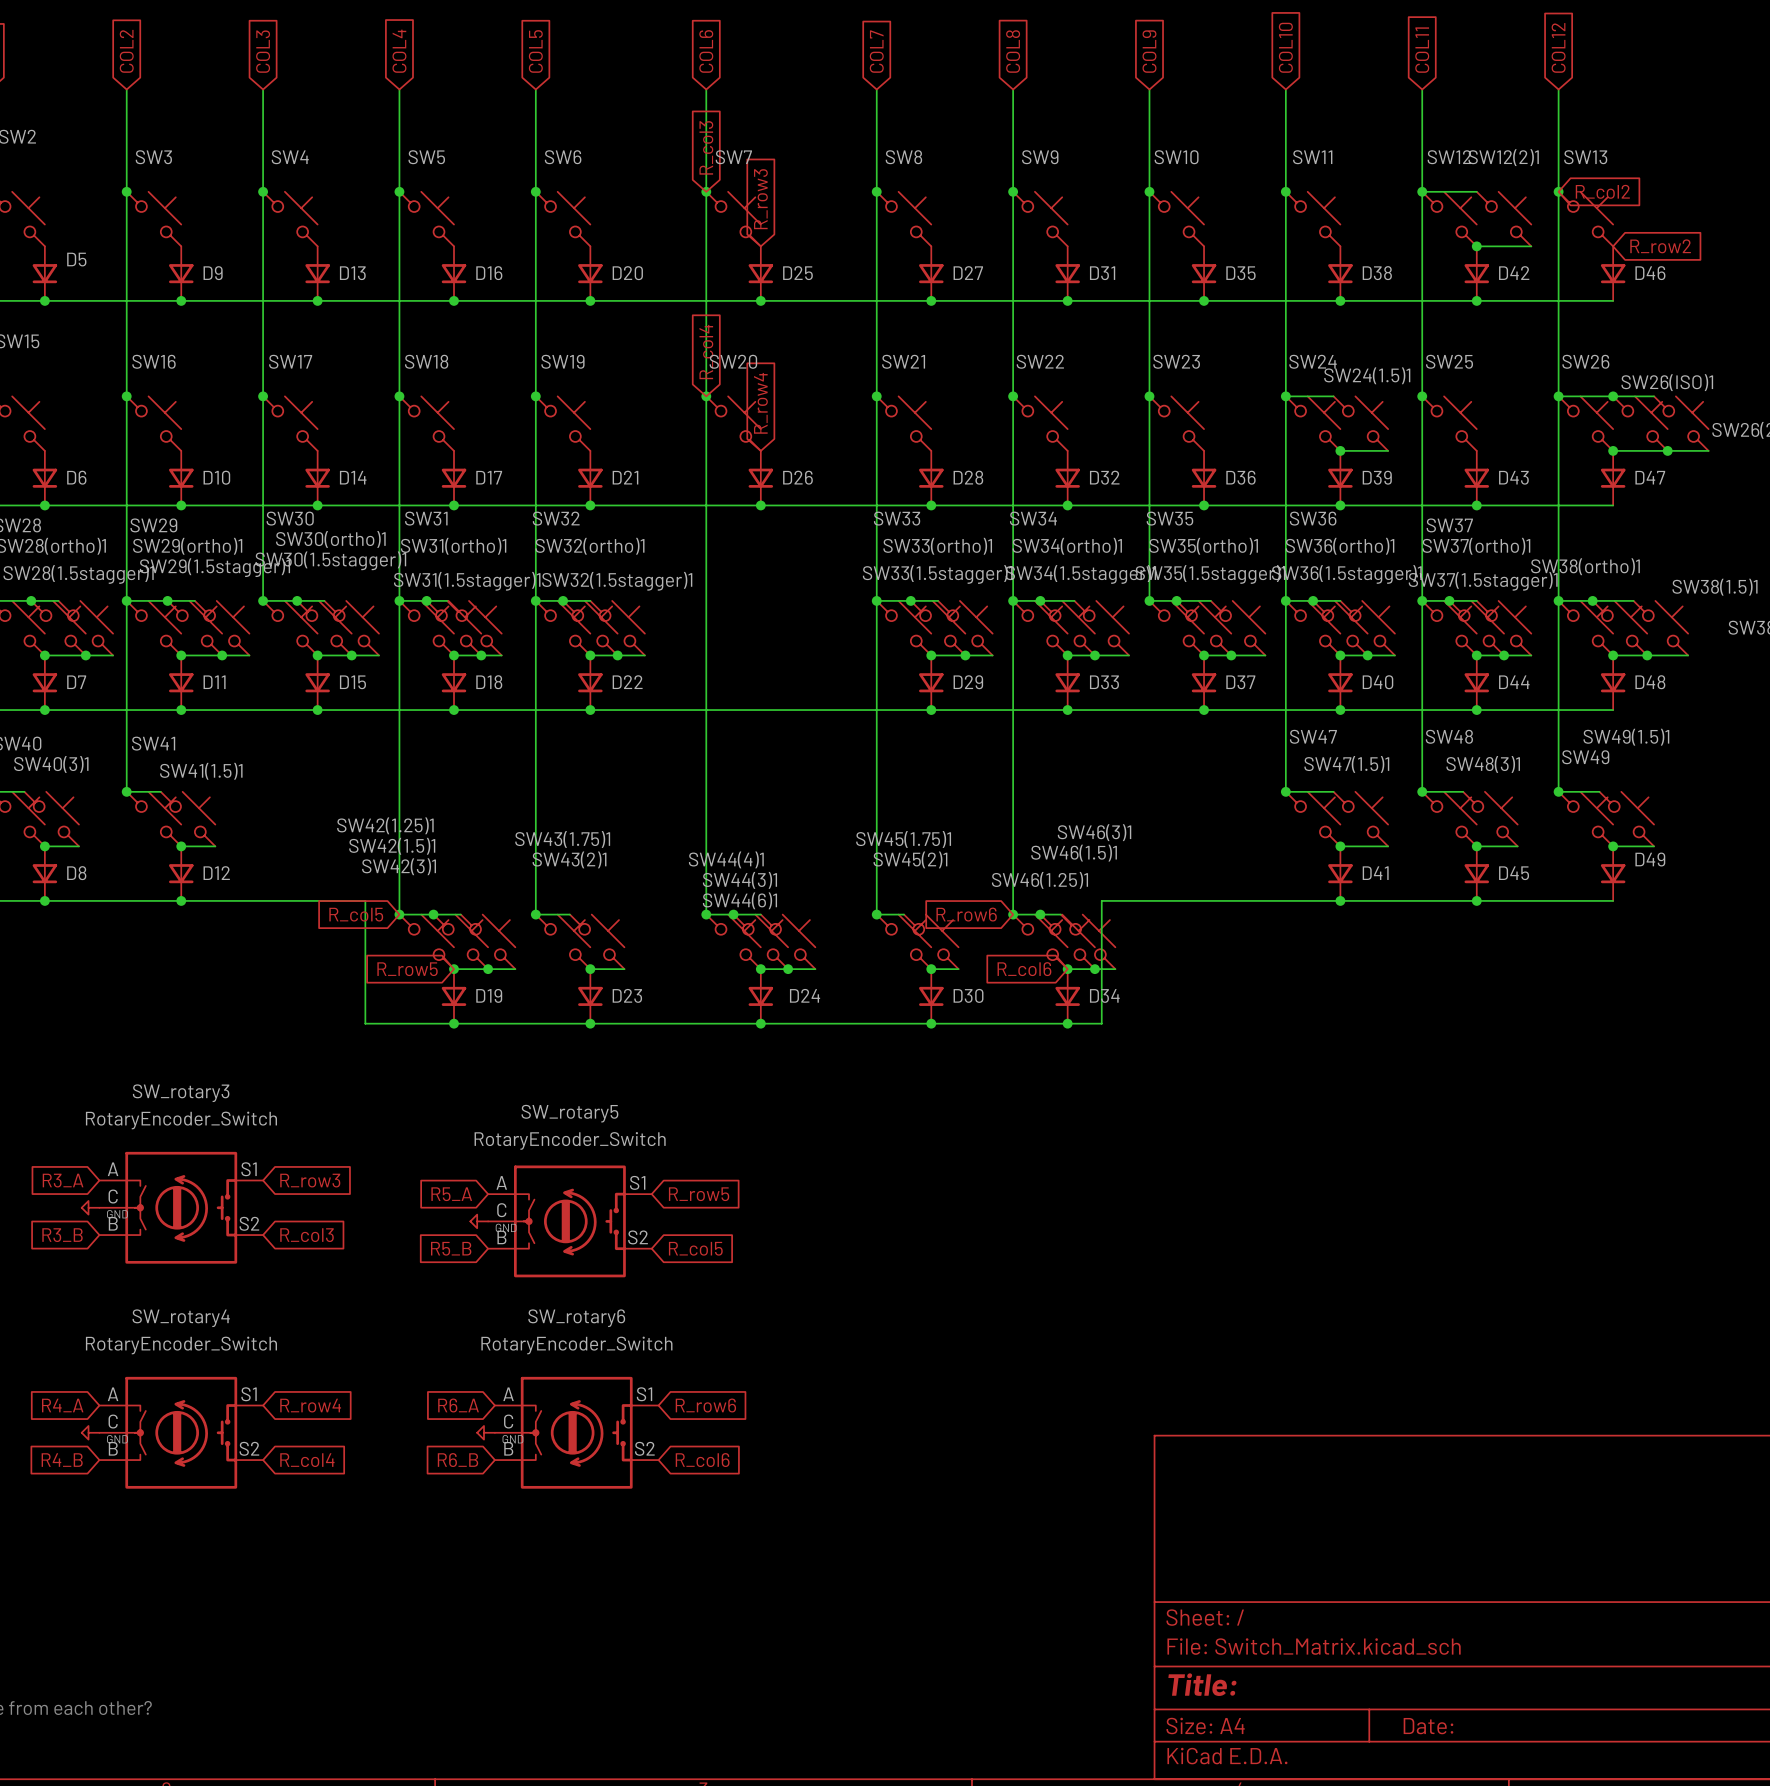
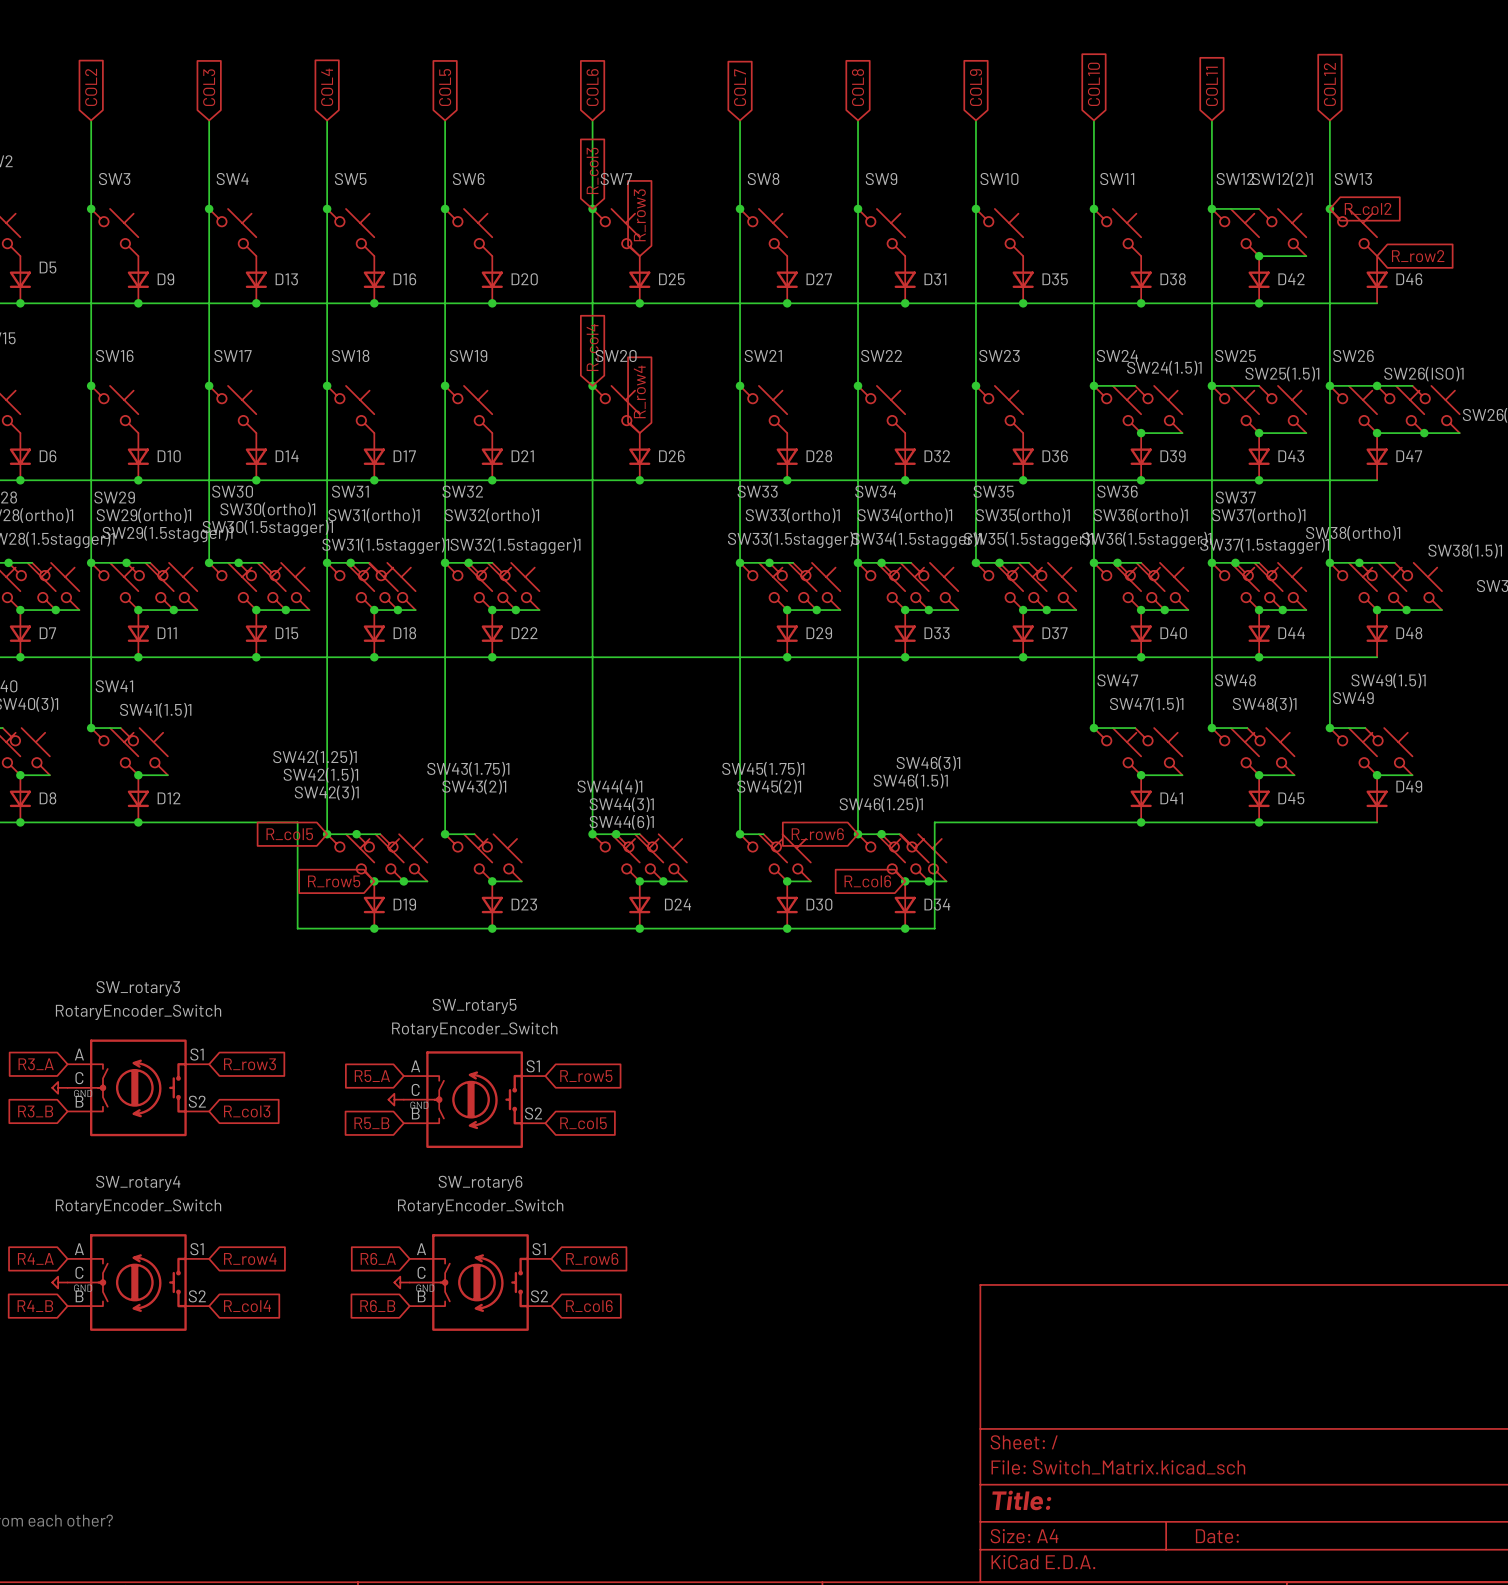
wire: none -> (1211, 385) (1259, 385)
SW25(1.5)1: none -> (1282, 409)
wire: none -> (1259, 433) (1306, 433)
junction: none -> (1259, 433)

